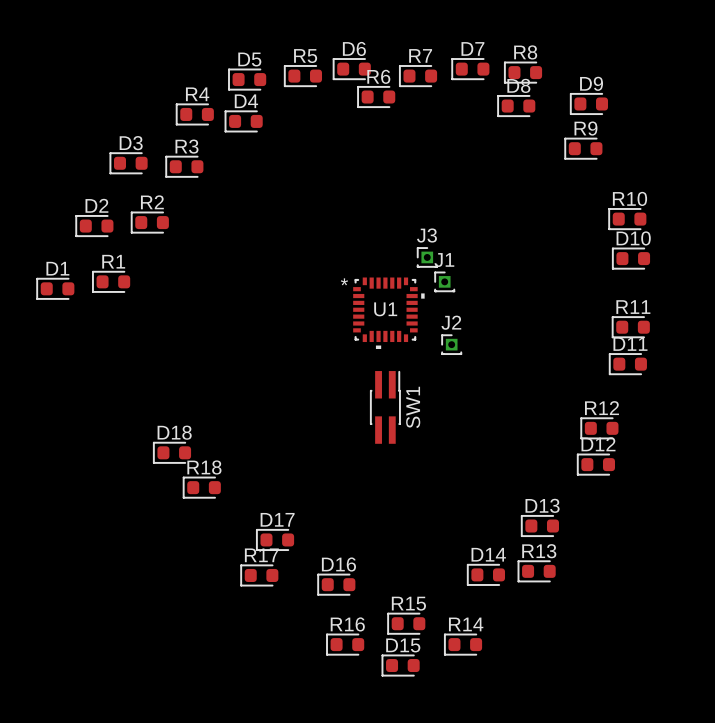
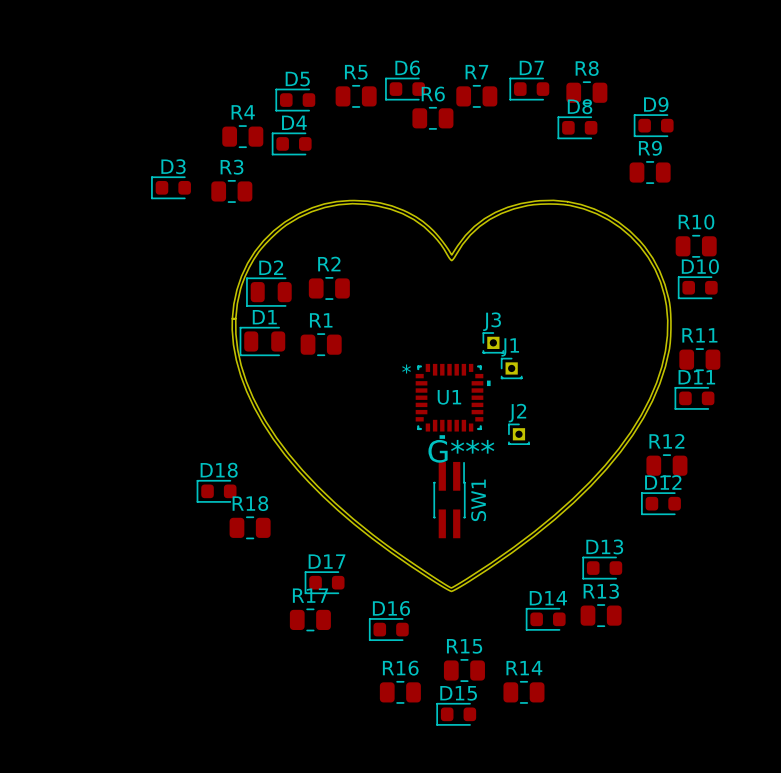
R8 footprint: [504, 61, 543, 84] -> [566, 81, 608, 105]
R5 footprint: [283, 65, 323, 88] -> [335, 84, 377, 108]
R7 footprint: [399, 65, 438, 88] -> [456, 84, 498, 108]
R6 footprint: [357, 86, 396, 108] -> [412, 106, 454, 130]
R4 footprint: [175, 103, 214, 126] -> [222, 125, 264, 149]
R9 footprint: [564, 137, 603, 160] -> [629, 161, 671, 184]
R3 footprint: [165, 155, 204, 178] -> [211, 180, 253, 203]
R10 footprint: [608, 208, 647, 231] -> [675, 234, 717, 258]
R2 footprint: [130, 211, 169, 234] -> [308, 277, 350, 300]
D2 footprint: [75, 215, 114, 237] -> [246, 277, 292, 307]
J3 position: (427, 257) -> (493, 342)
R1 footprint: [92, 270, 131, 293] -> [300, 333, 342, 357]
D1 footprint: [36, 277, 75, 300] -> [239, 326, 286, 357]
J1 position: (444, 281) -> (511, 368)
U1 position: (388, 313) -> (453, 401)
R11 footprint: [611, 316, 650, 339] -> [679, 348, 721, 372]
J2 position: (451, 344) -> (518, 434)
G***: none -> (451, 395)
SW1 position: (385, 407) -> (449, 500)
R12 footprint: [580, 417, 619, 440] -> [646, 454, 688, 478]
R18 footprint: [182, 476, 221, 499] -> [229, 516, 271, 540]
R13 footprint: [517, 560, 556, 583] -> [580, 604, 622, 628]
R17 footprint: [240, 564, 279, 587] -> [289, 608, 331, 632]
R15 footprint: [387, 612, 426, 635] -> [443, 659, 485, 682]
R16 footprint: [326, 633, 365, 656] -> [379, 680, 421, 704]
R14 footprint: [444, 633, 483, 656] -> [503, 680, 545, 704]

